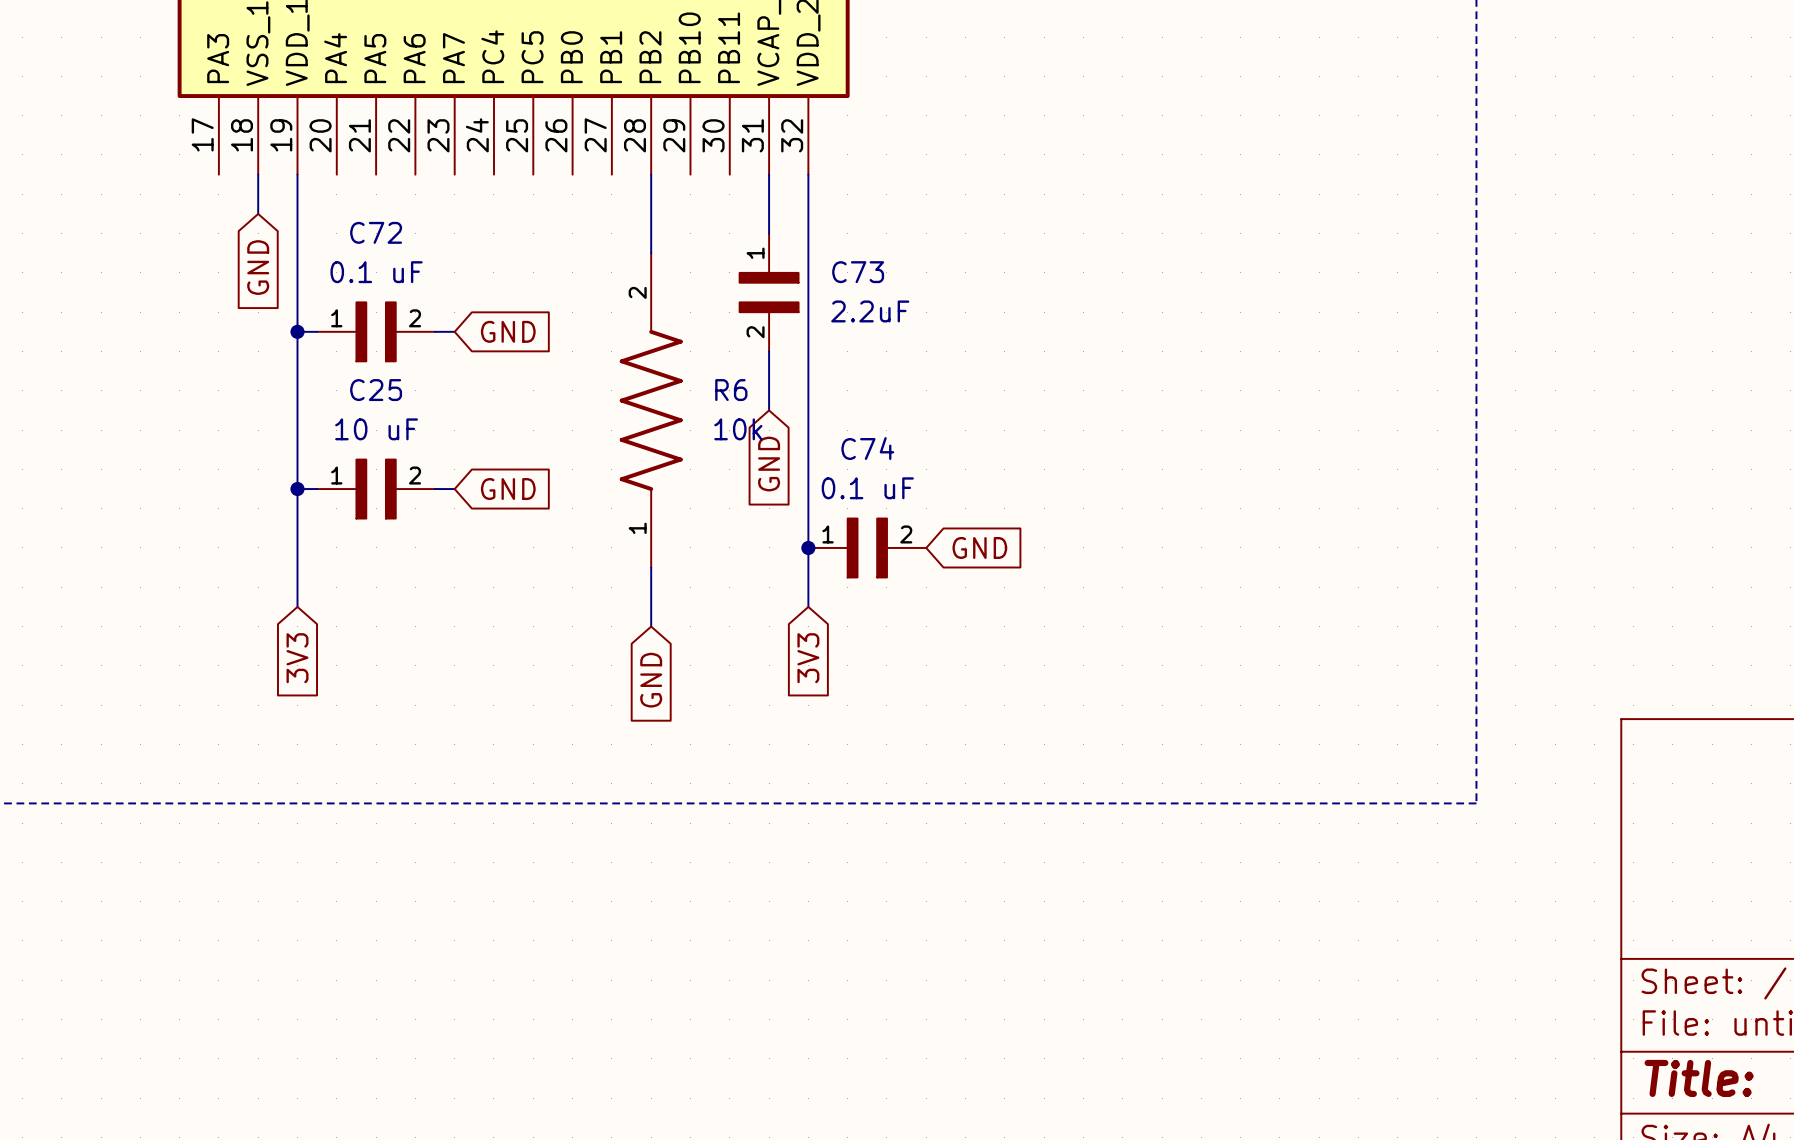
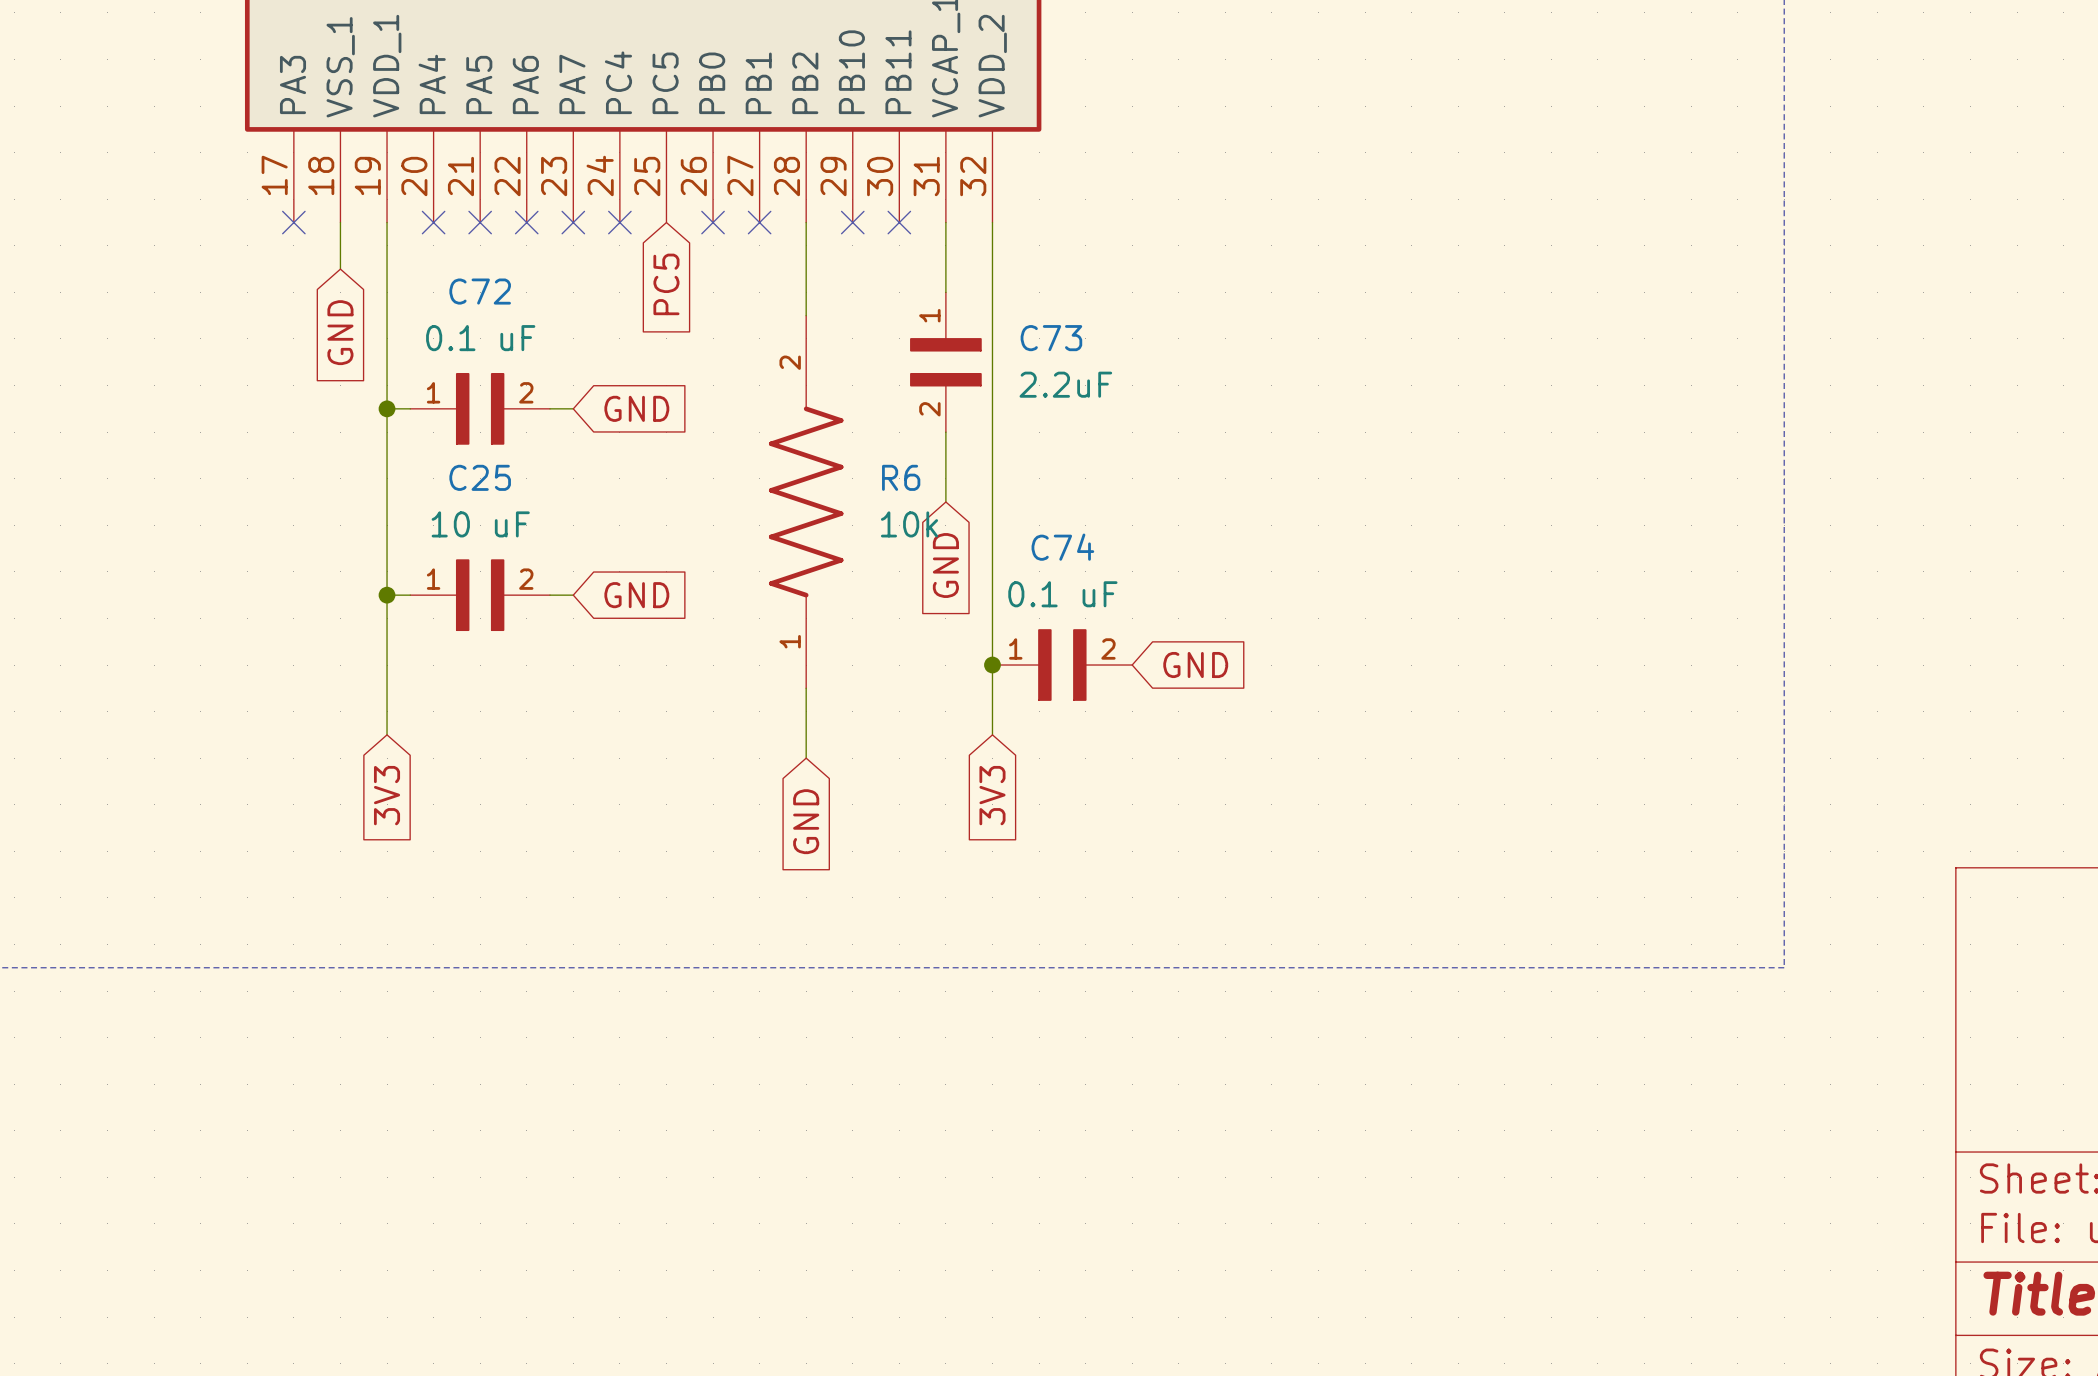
no-connect mark: none -> (293, 222)
no-connect mark: none -> (433, 222)
no-connect mark: none -> (480, 222)
no-connect mark: none -> (526, 222)
no-connect mark: none -> (573, 222)
no-connect mark: none -> (619, 222)
no-connect mark: none -> (713, 222)
no-connect mark: none -> (759, 222)
no-connect mark: none -> (852, 222)
no-connect mark: none -> (899, 222)
global label: none -> PC5 (666, 284)

